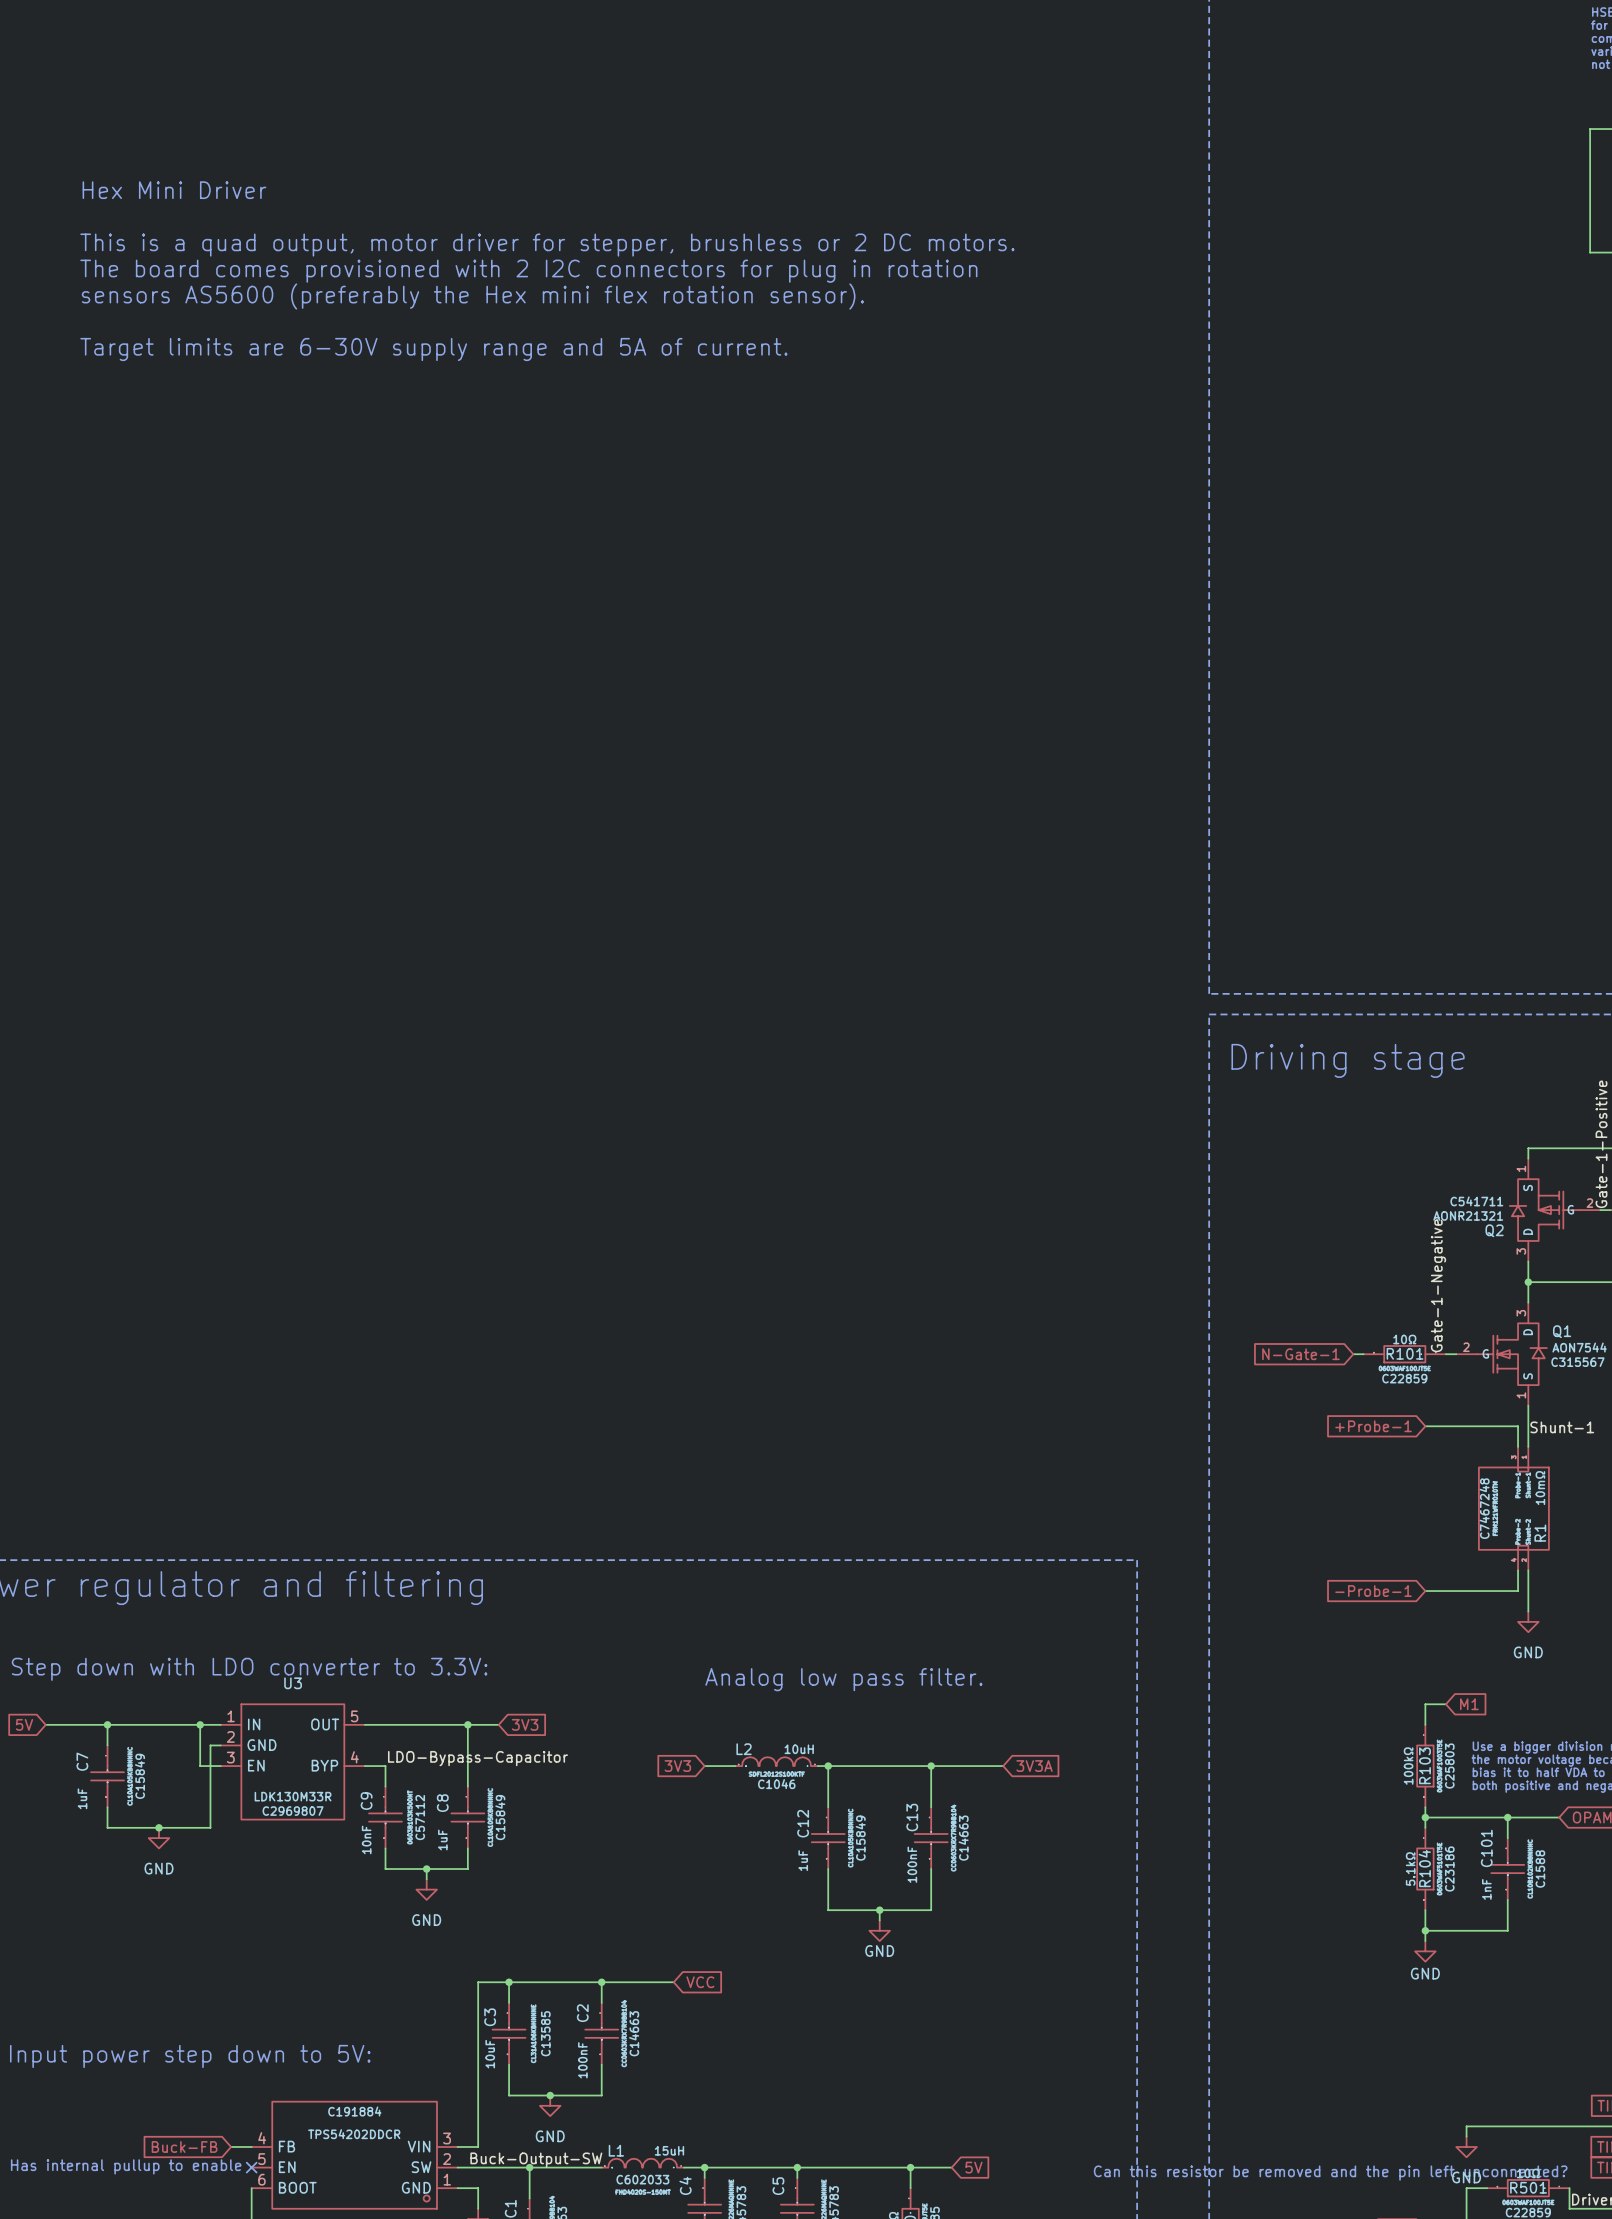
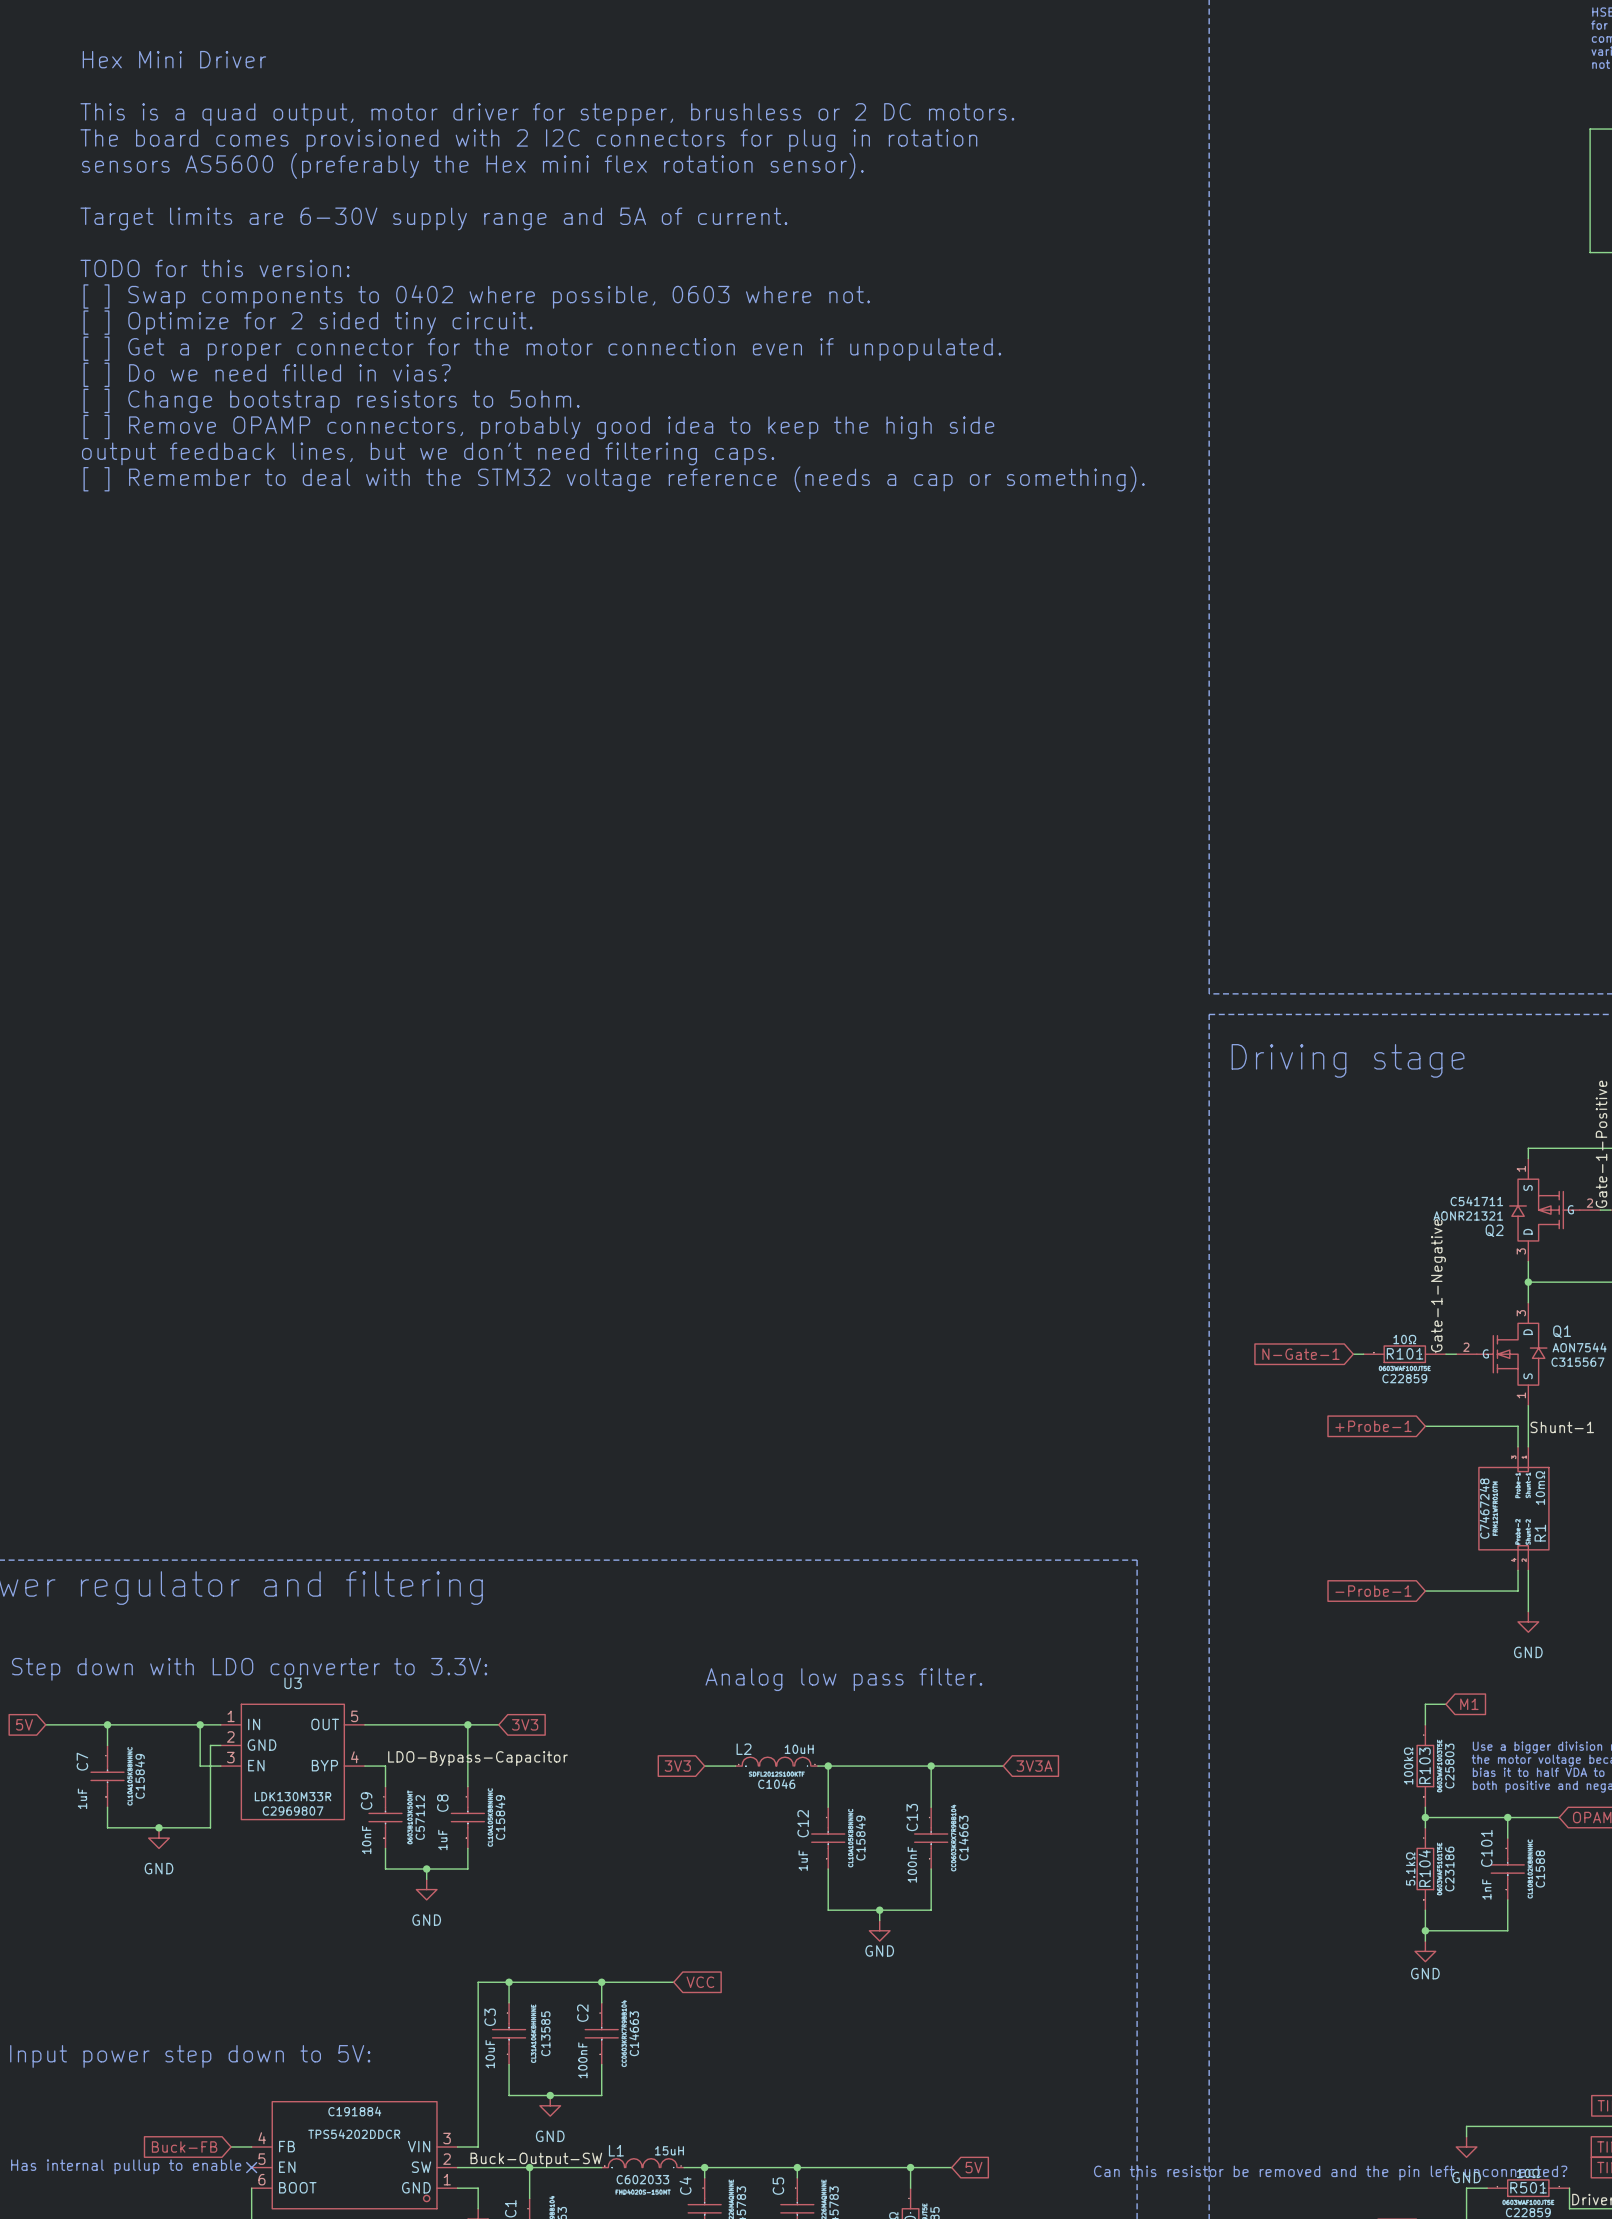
text: none -> The board comes provisioned with 2 I2C connectors for plug in rotation (528, 140)
text: none -> sensors AS5600 (preferably the Hex mini flex rotation sensor). (472, 165)
text position: Hex Mini Driver (174, 190) -> Hex Mini Driver (174, 59)
text: none -> Target limits are 6-30V supply range and 5A of current. (433, 218)
text position: This is a quad output, motor driver for stepper, brushless or 2 DC motors. (547, 245) -> This is a quad output, motor driver for stepper, brushless or 2 DC motors. (547, 114)
text: The board comes provisioned with 2 I2C connectors for plug in rotation (528, 271) -> TODO for this version: (215, 268)
text: sensors AS5600 (preferably the Hex mini flex rotation sensor). (472, 296) -> [ ] Swap components to 0402 where possible, 0603 where not. (476, 296)
text: none -> [ ] Optimize for 2 sided tiny circuit. (308, 322)
text: Target limits are 6-30V supply range and 5A of current. (433, 349) -> [ ] Get a proper connector for the motor connection even if unpopulated. (542, 348)
text: none -> [ ] Do we need filled in vias? (267, 374)
text: none -> [ ] Change bootstrap resistors to 5ohm. (331, 400)
text: none -> [ ] Remove OPAMP connectors, probably good idea to keep the high side (538, 427)
text: none -> output feedback lines, but we don't need filtering caps. (428, 453)
text: none -> [ ] Remember to deal with the STM32 voltage reference (needs a cap or something). (614, 479)

